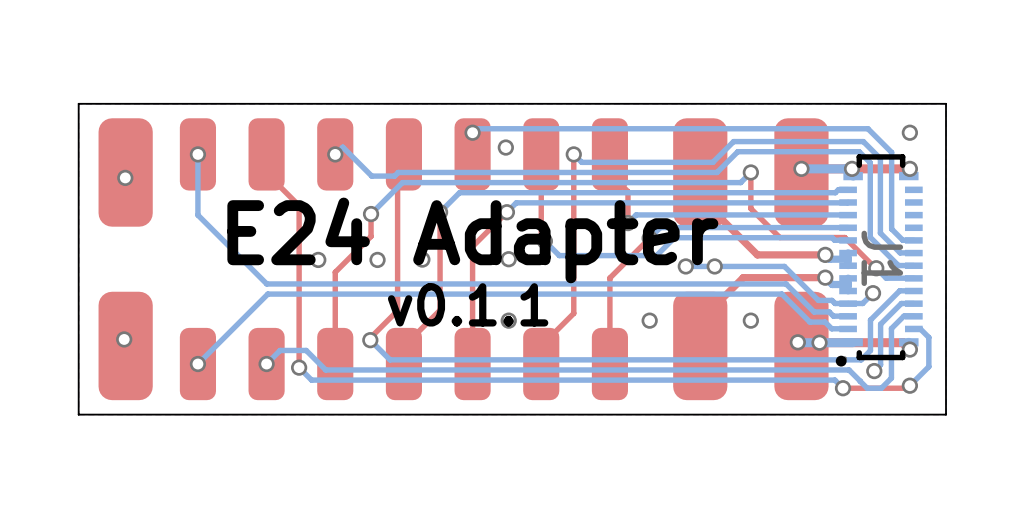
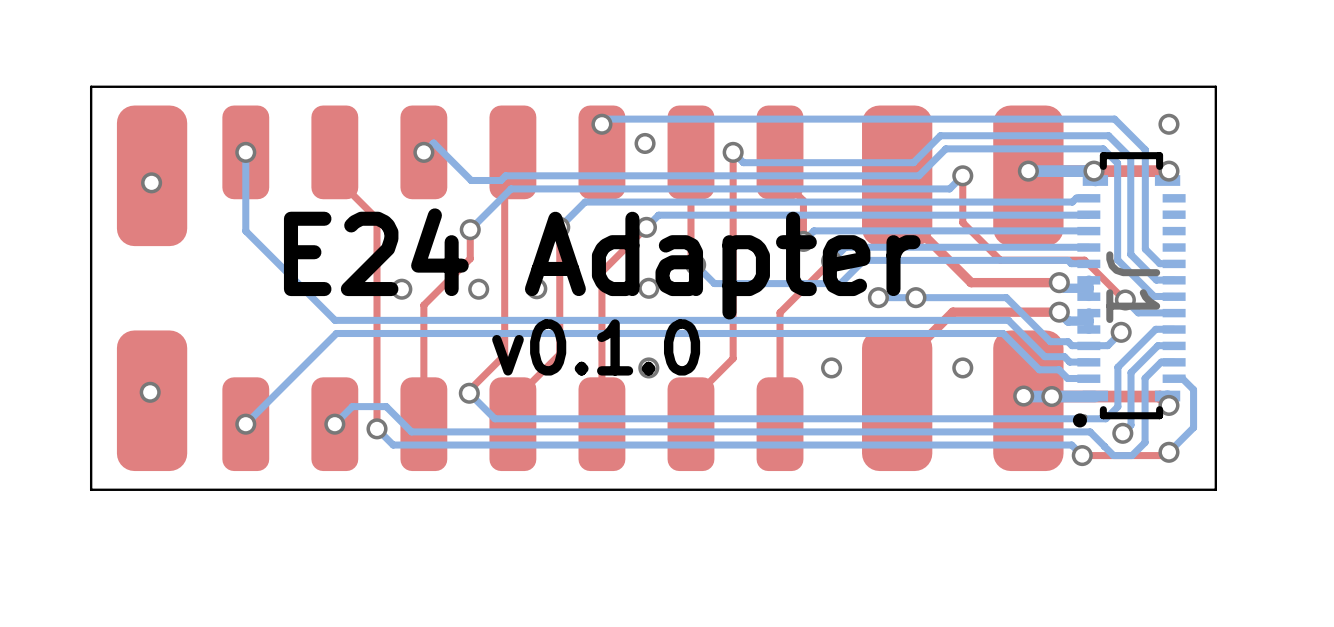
text: v0.1.1 (468, 304) -> v0.1.0 (596, 347)

